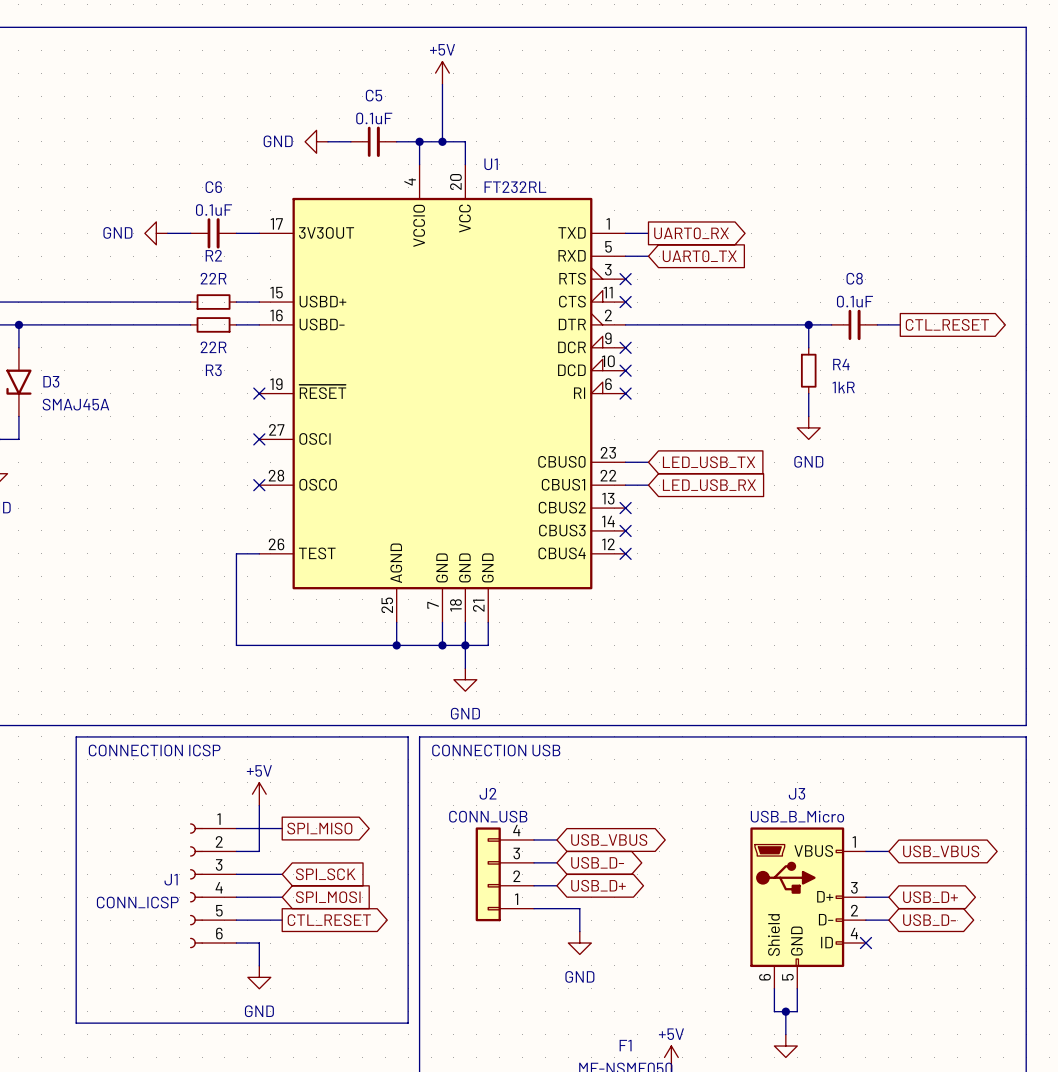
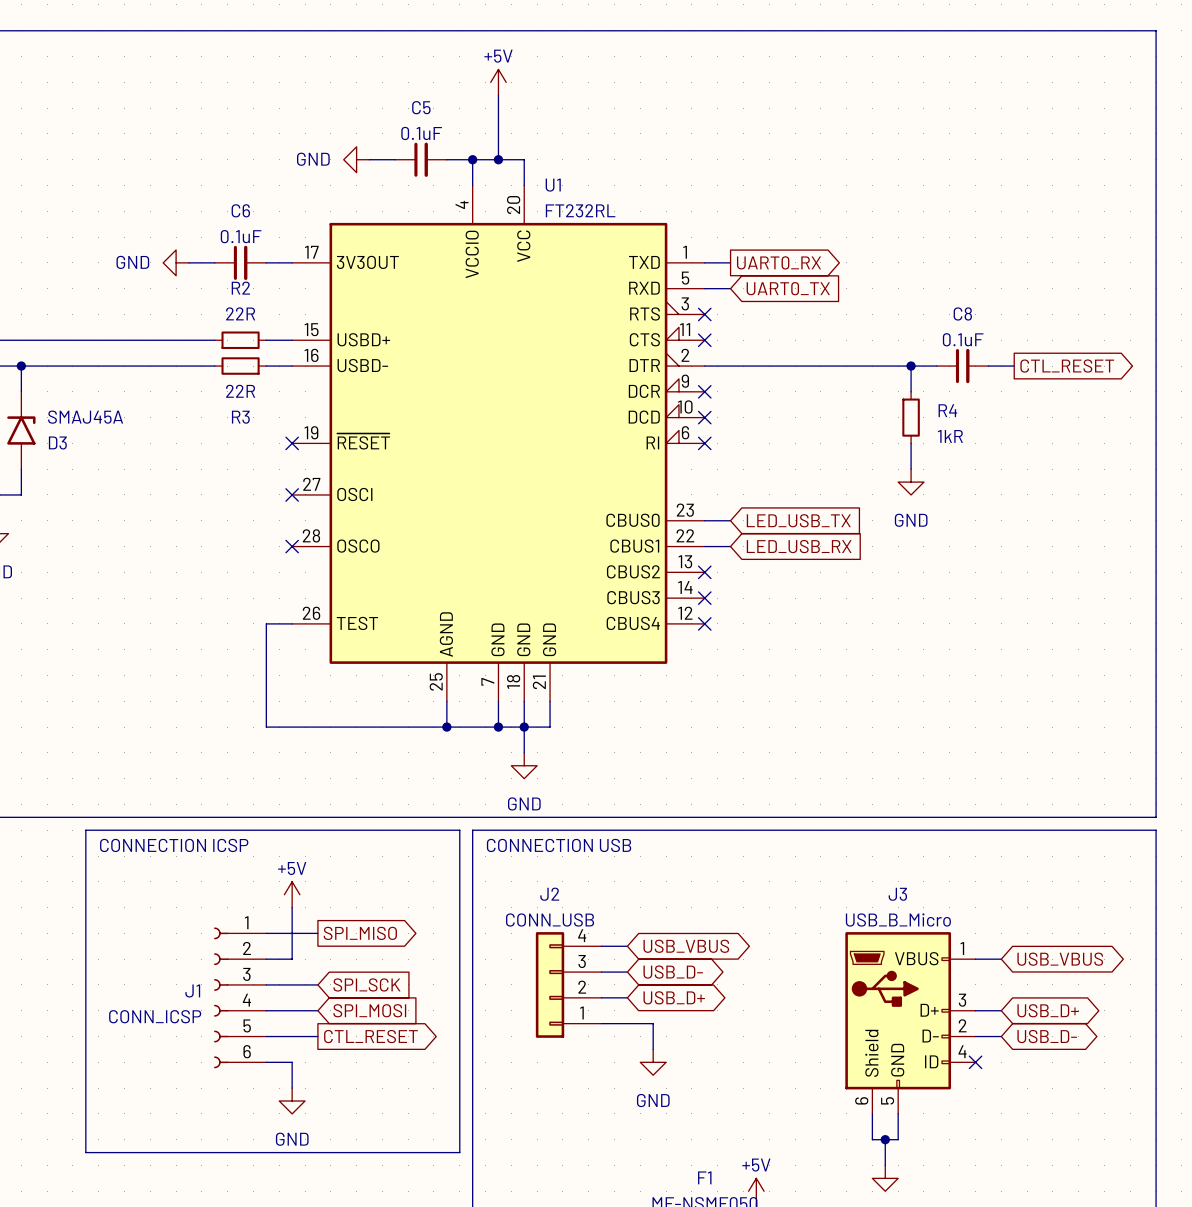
D3 rotation: 0° (18, 382) -> 180° (21, 430)
D3 value position: SMAJ45A (75, 404) -> SMAJ45A (85, 417)

